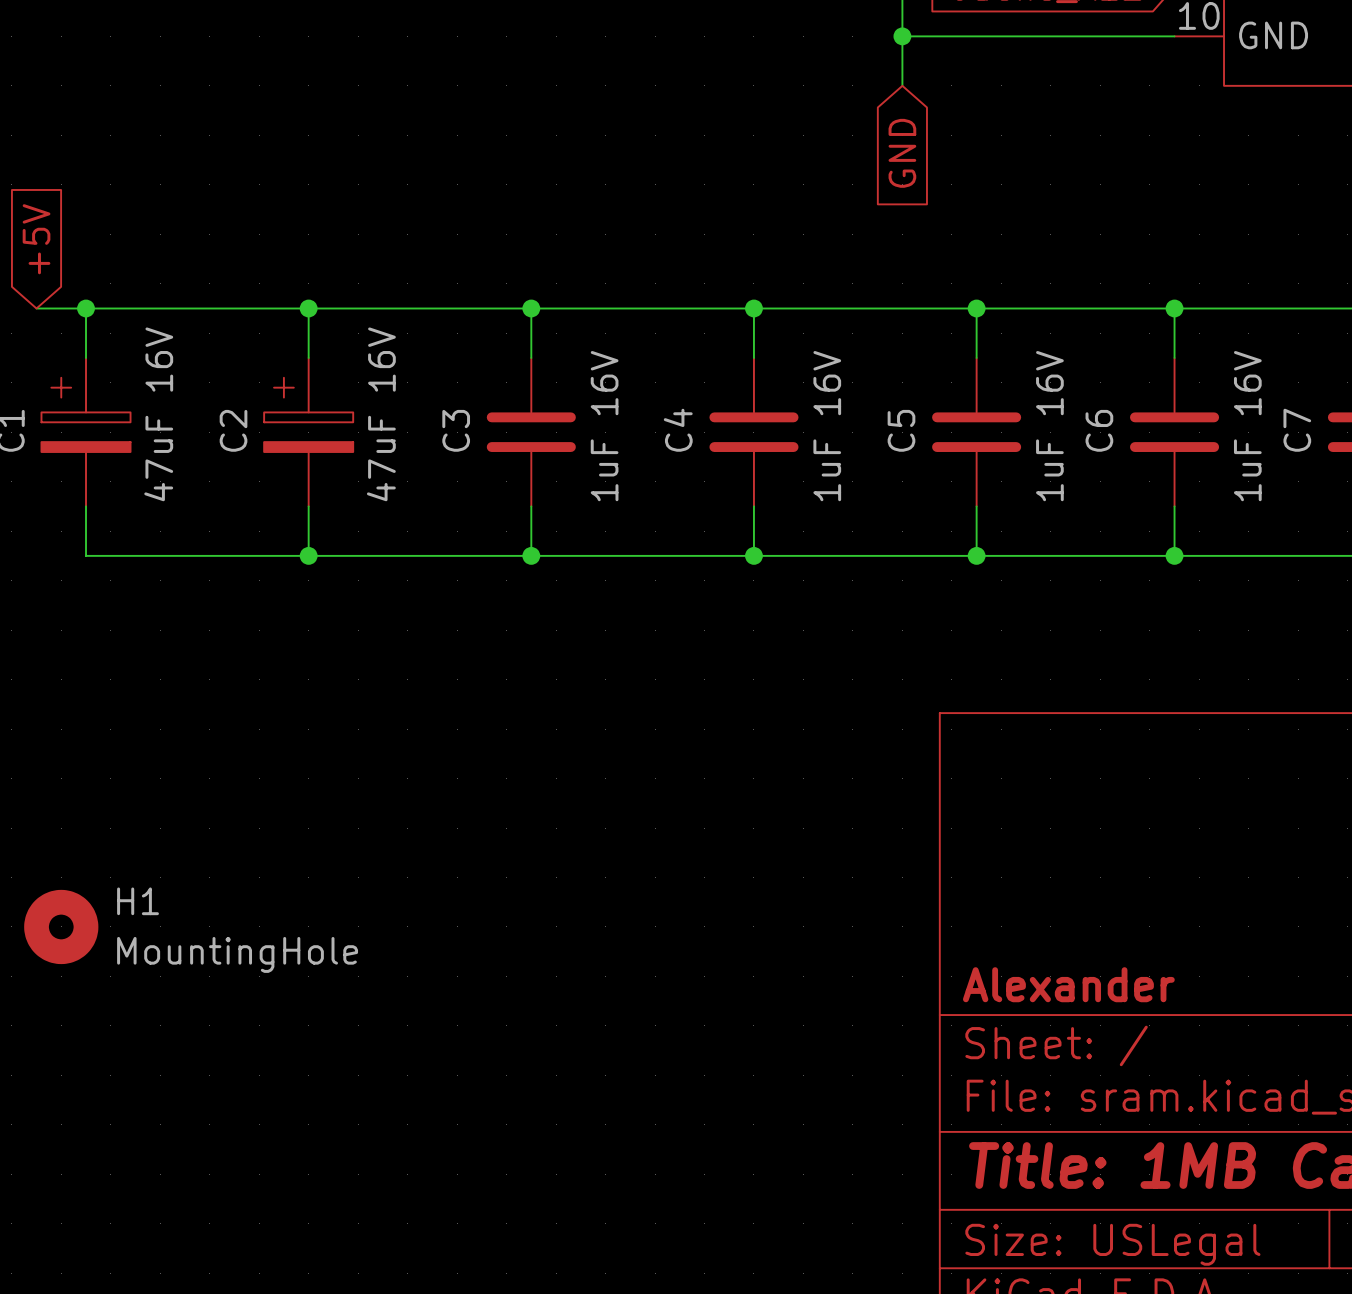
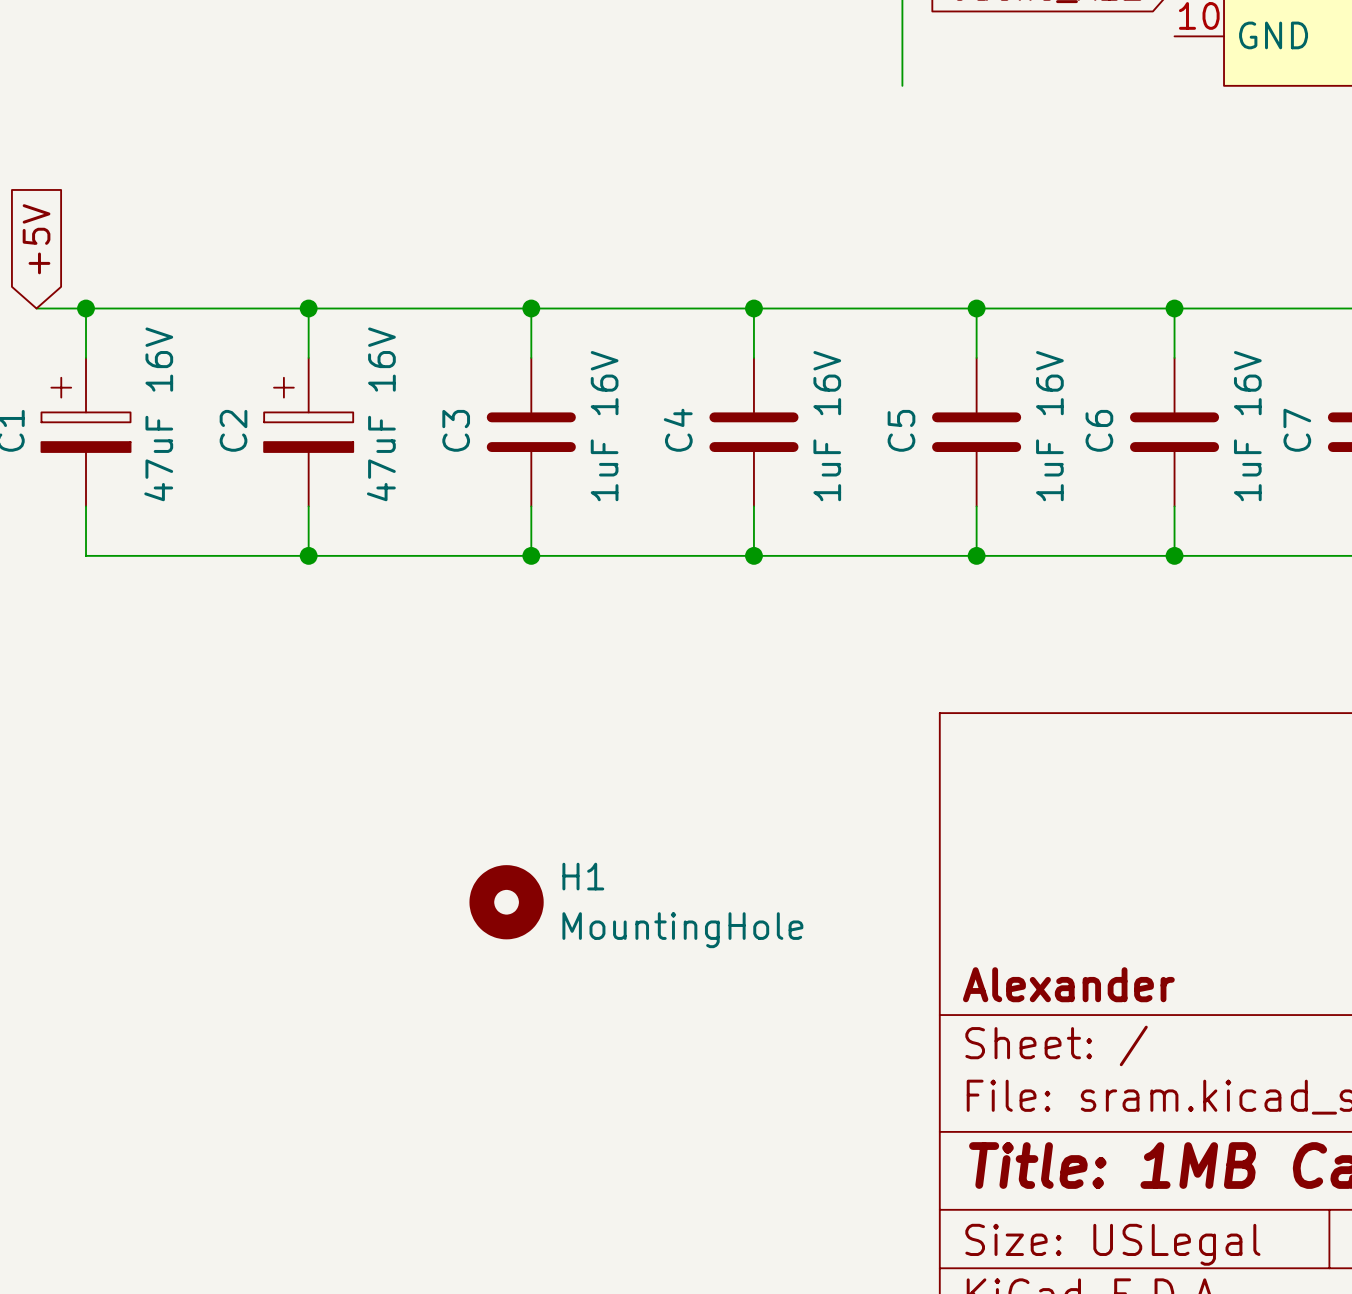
wire: (902, 36) (1174, 36) -> none
junction: (902, 36) -> none
global label: GND (902, 153) -> none
H1 position: (61, 926) -> (506, 902)

